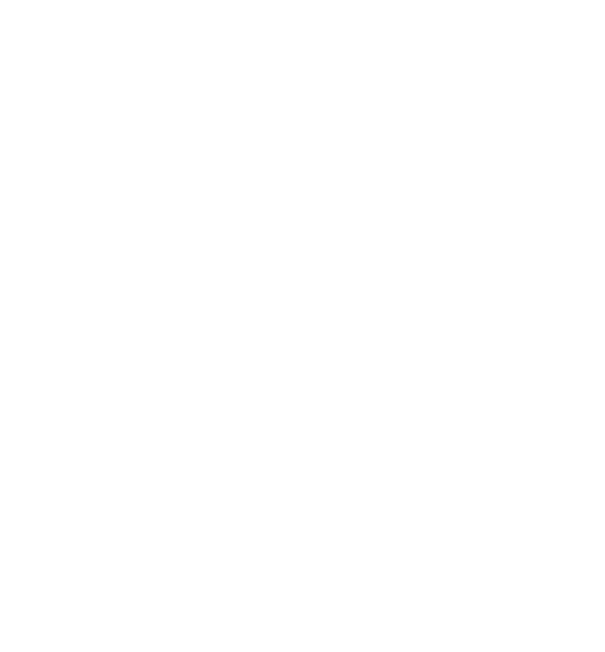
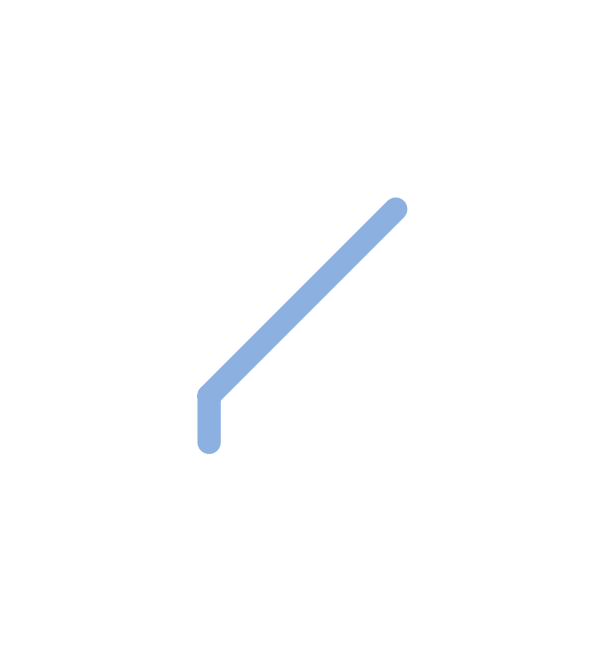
bottom track: none -> (395, 209) (209, 395) (209, 442)

